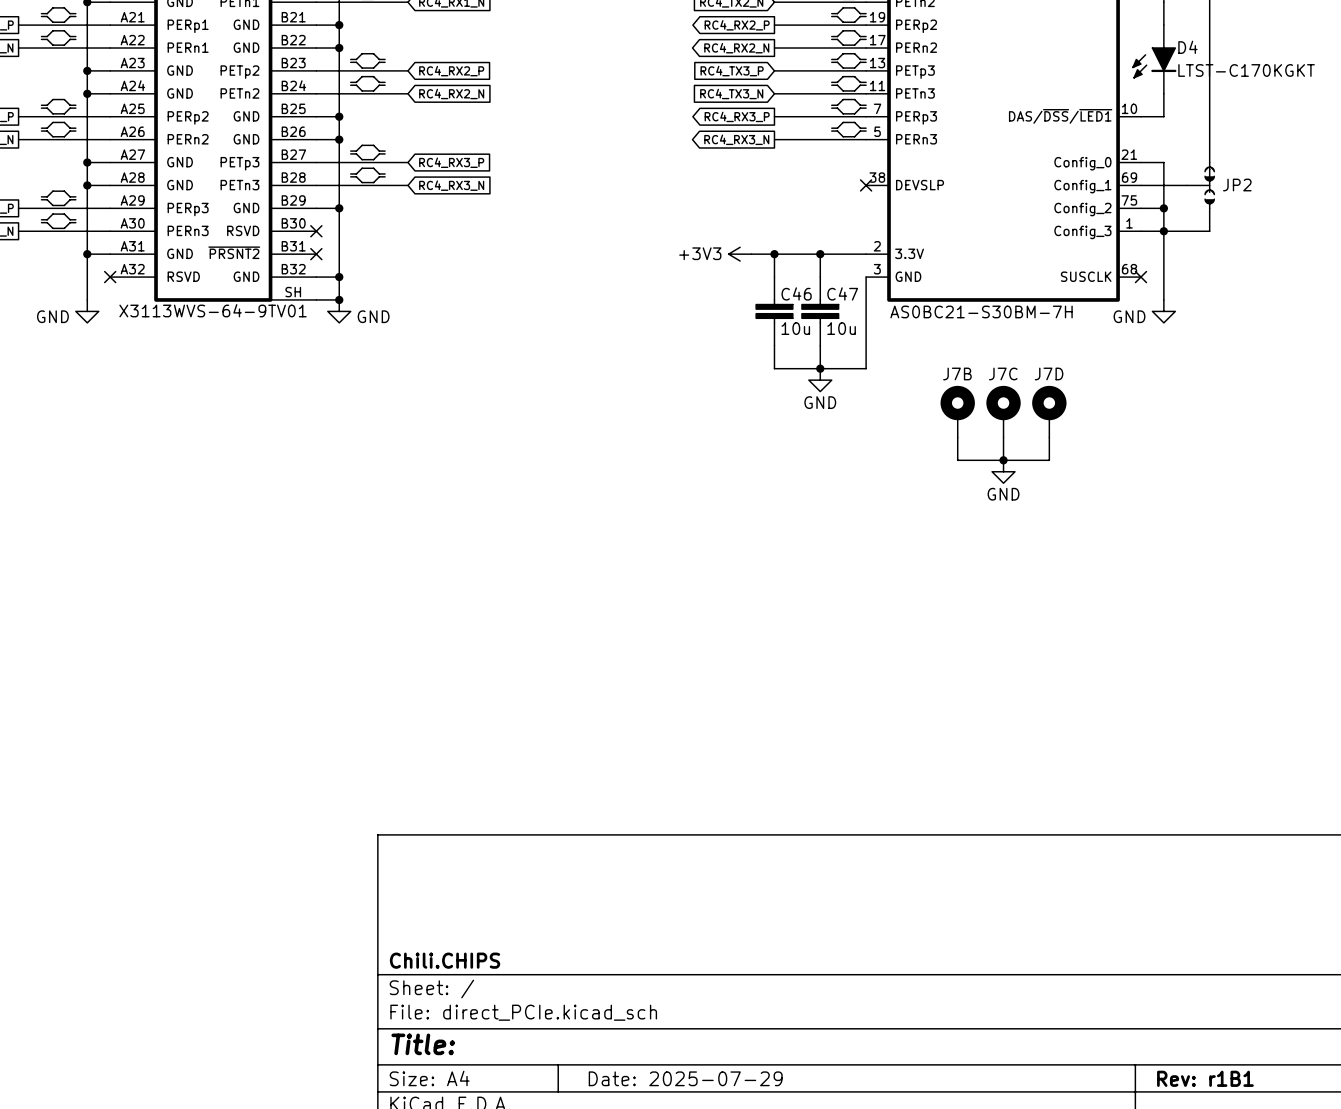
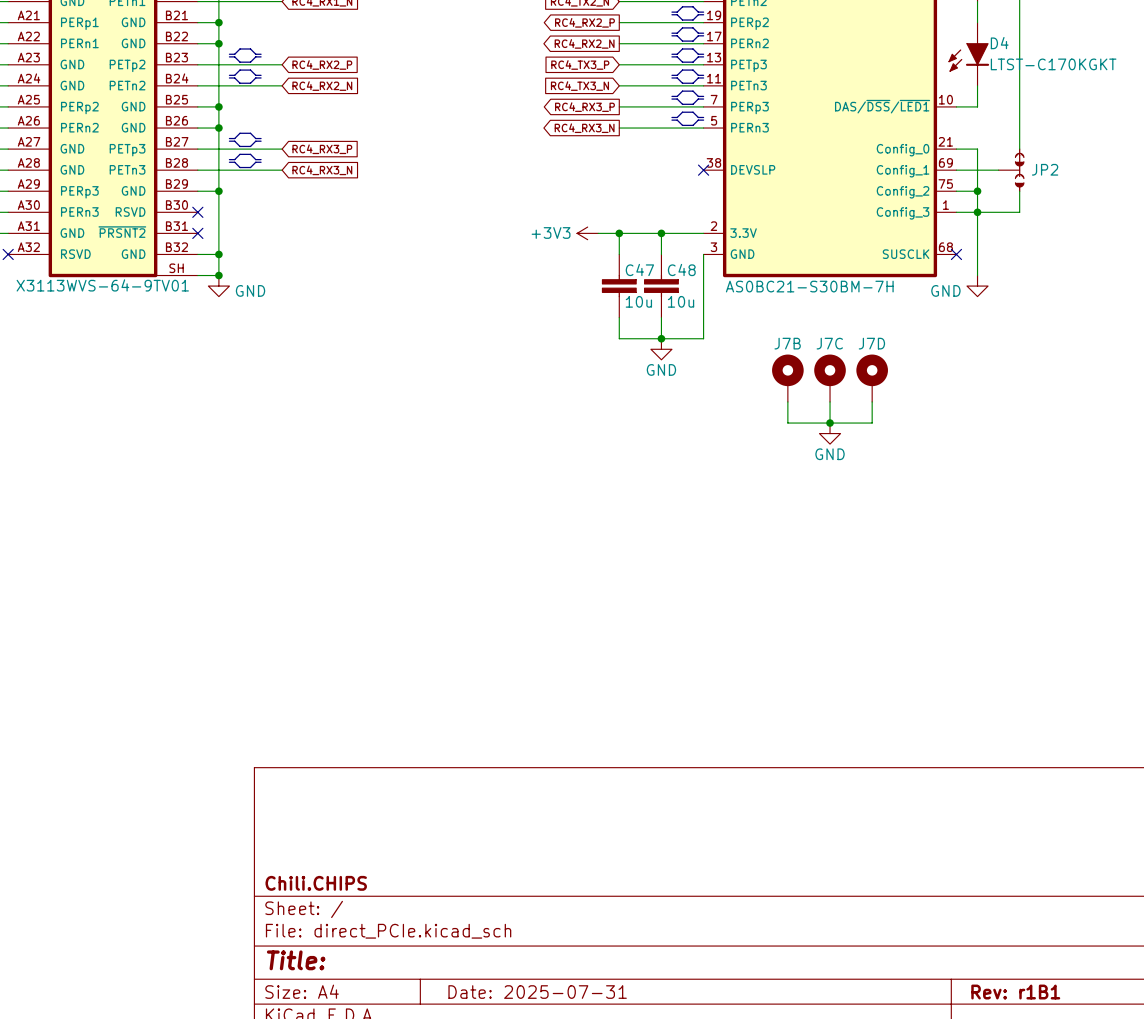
C46 name: C46 (796, 293) -> C47 (639, 269)
C47 name: C47 (842, 293) -> C48 (681, 269)
title block: Date: 2025-07-29 (685, 1078) -> Date: 2025-07-31 (537, 992)

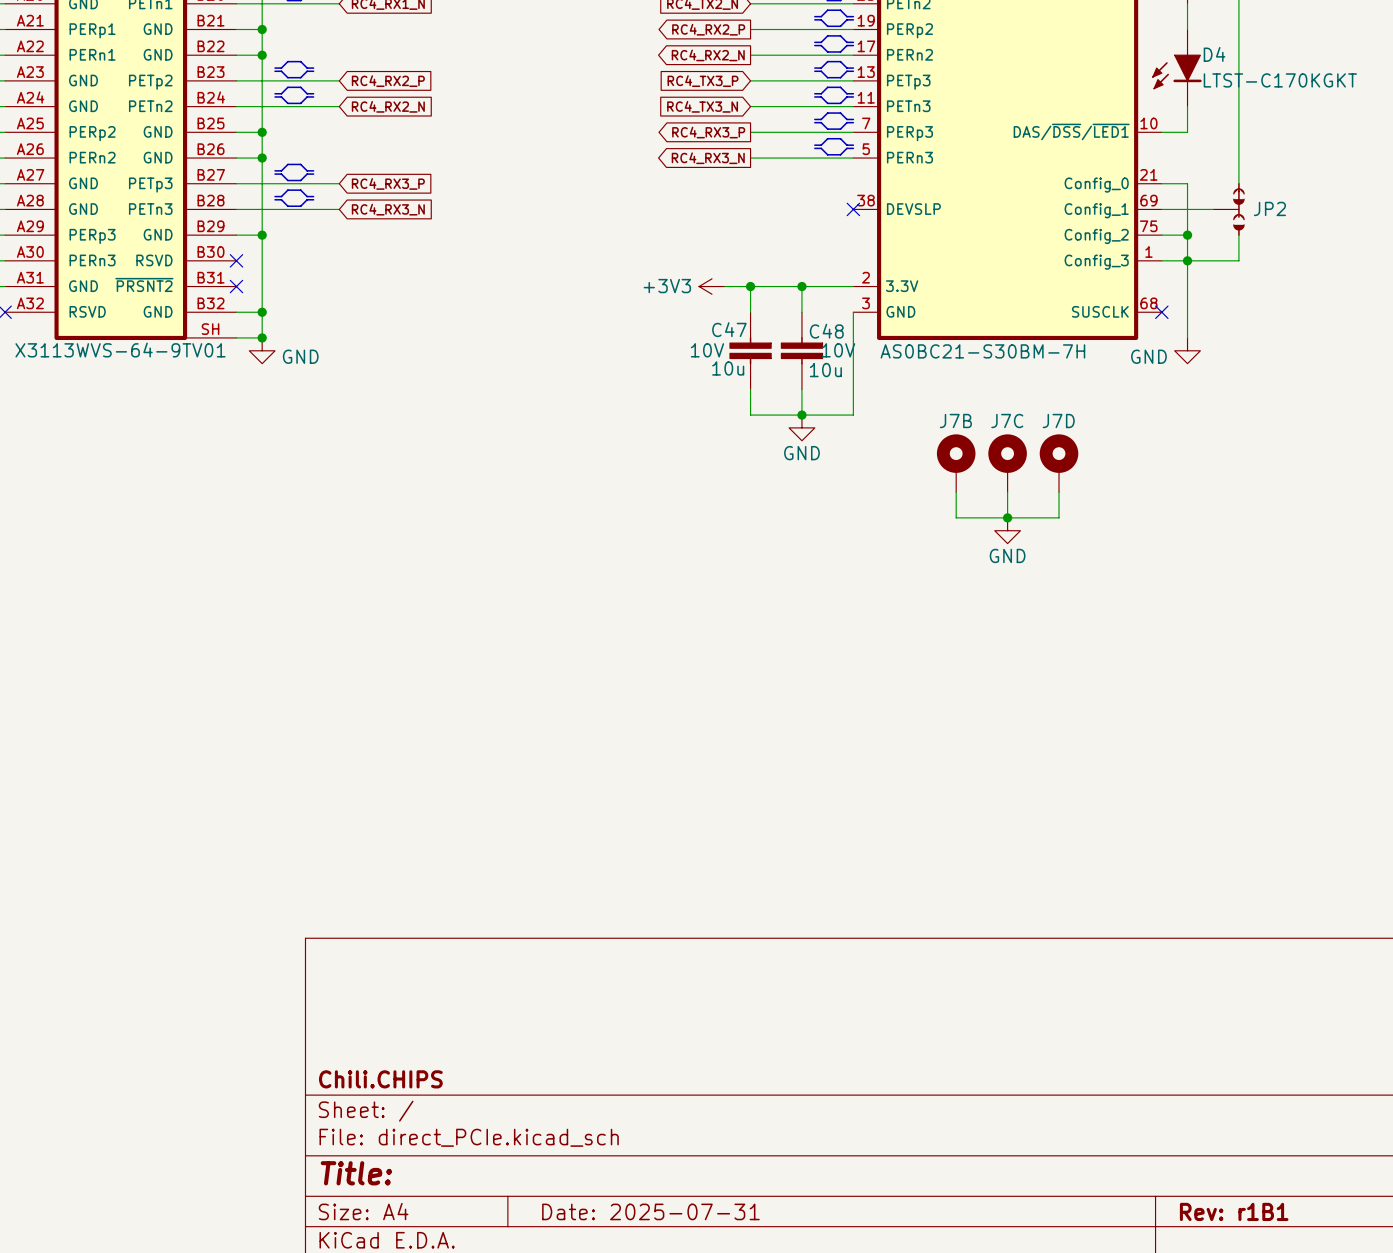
C47 name position: C47 (639, 269) -> C47 (729, 329)
C47 text: none -> 10V (707, 350)
C48 text: none -> 10V (838, 350)
C47 value position: 10u (638, 301) -> 10u (728, 368)

